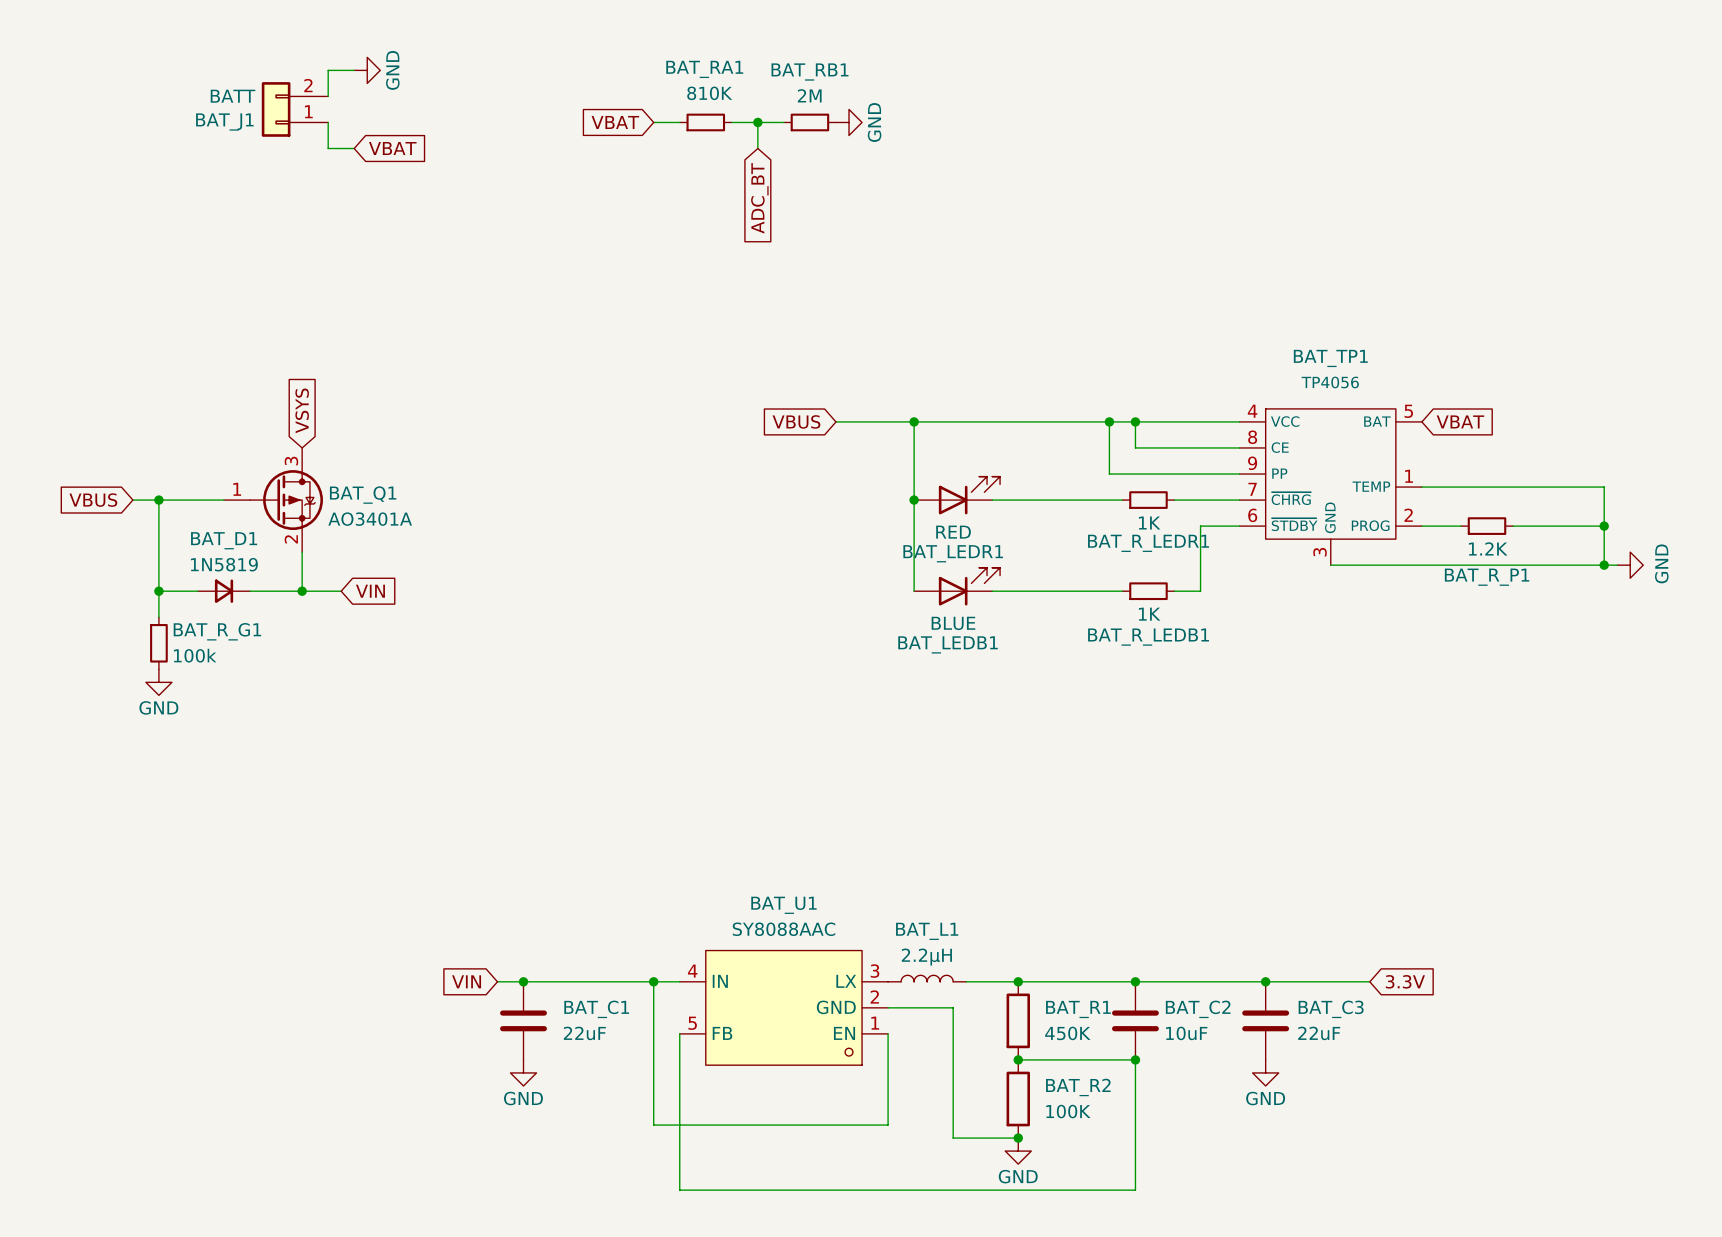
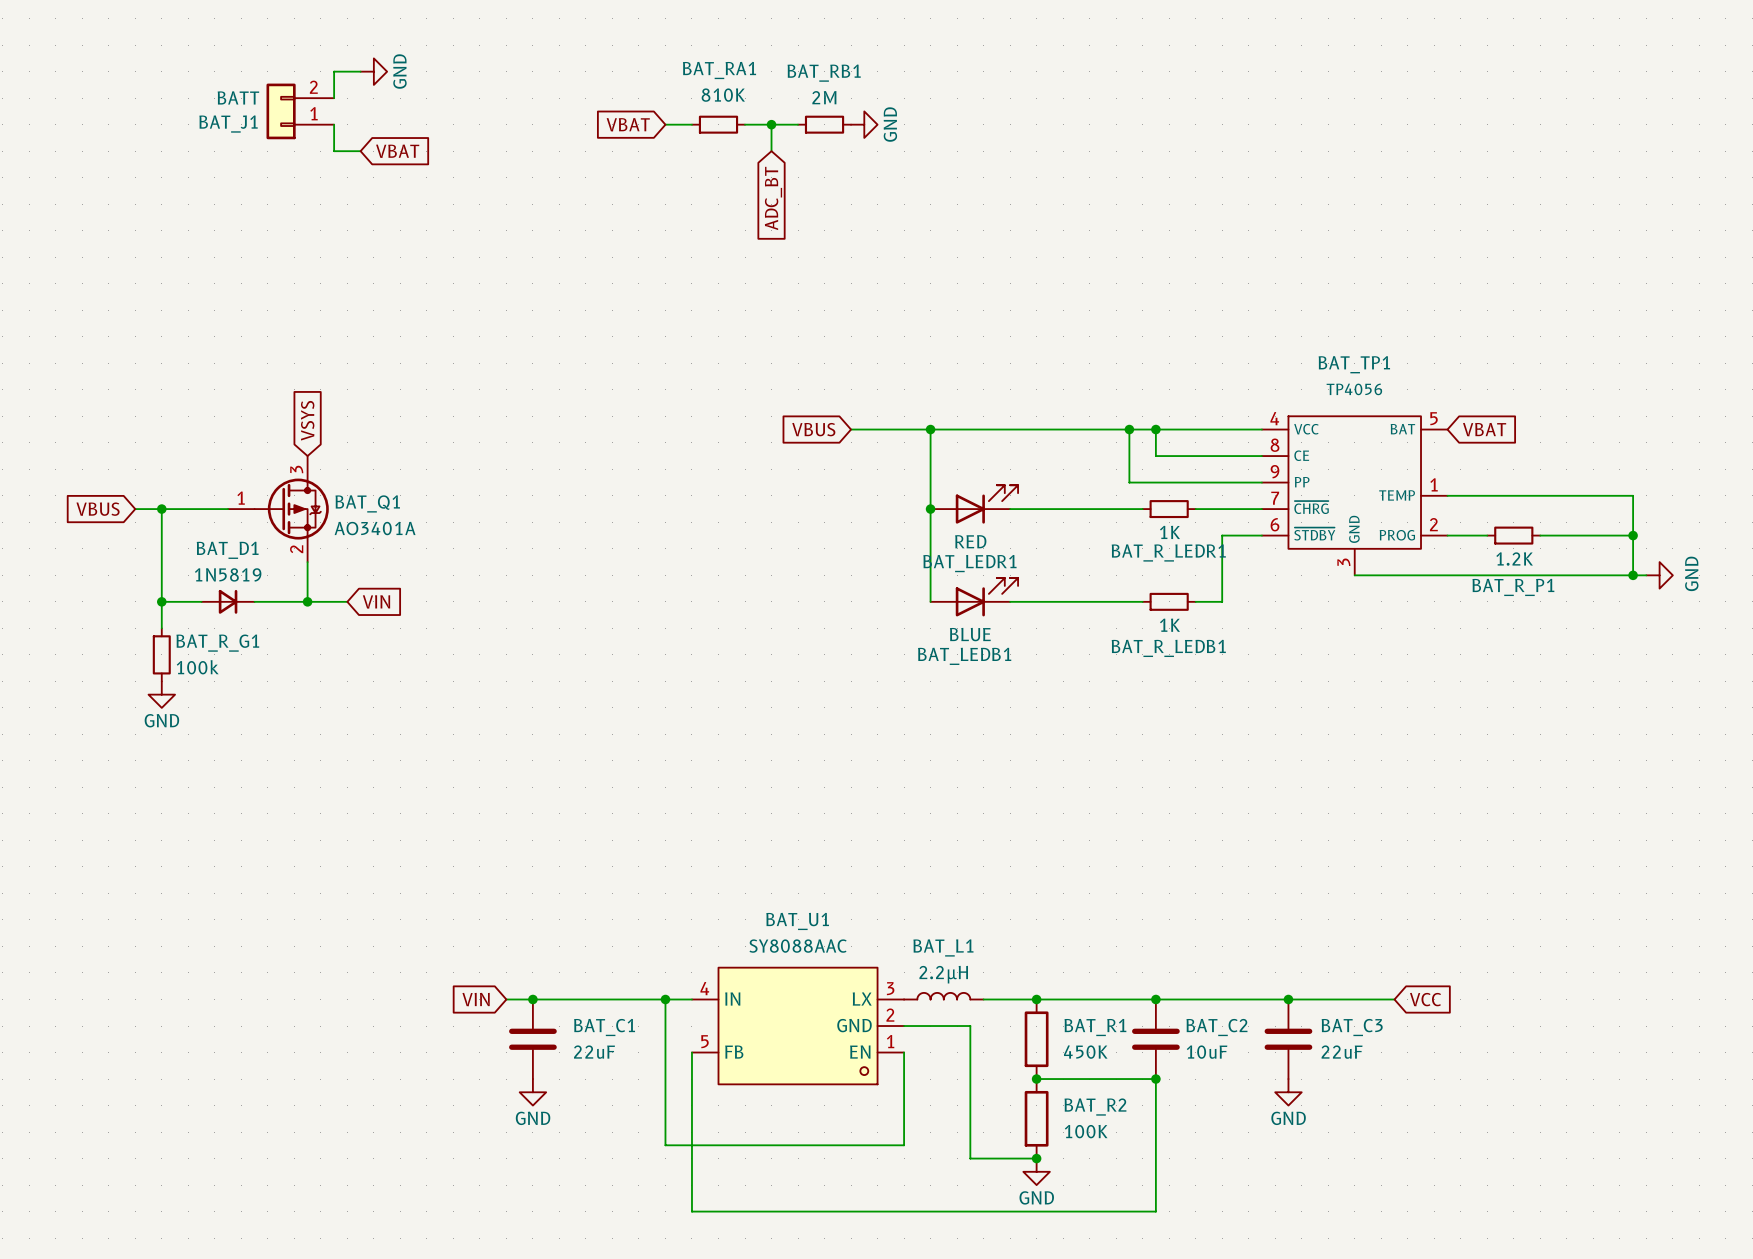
global label: 3.3V (1405, 981) -> VCC (1425, 999)

